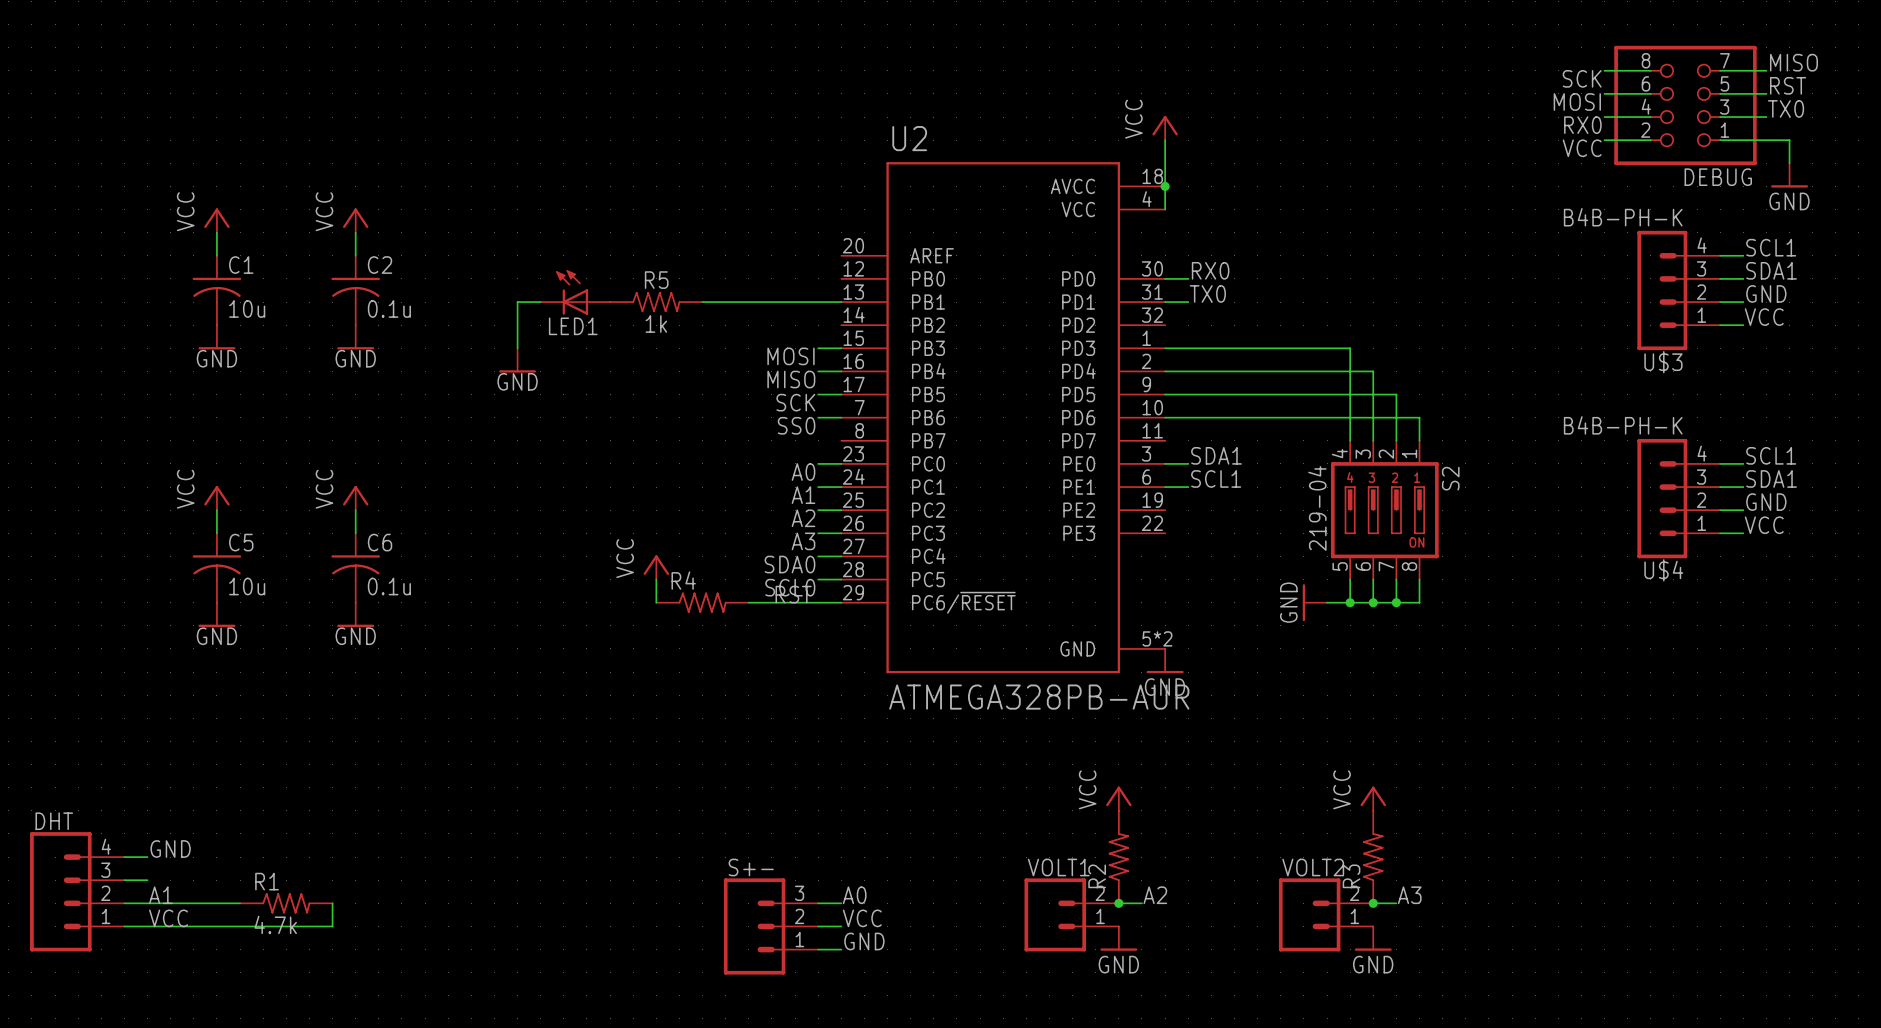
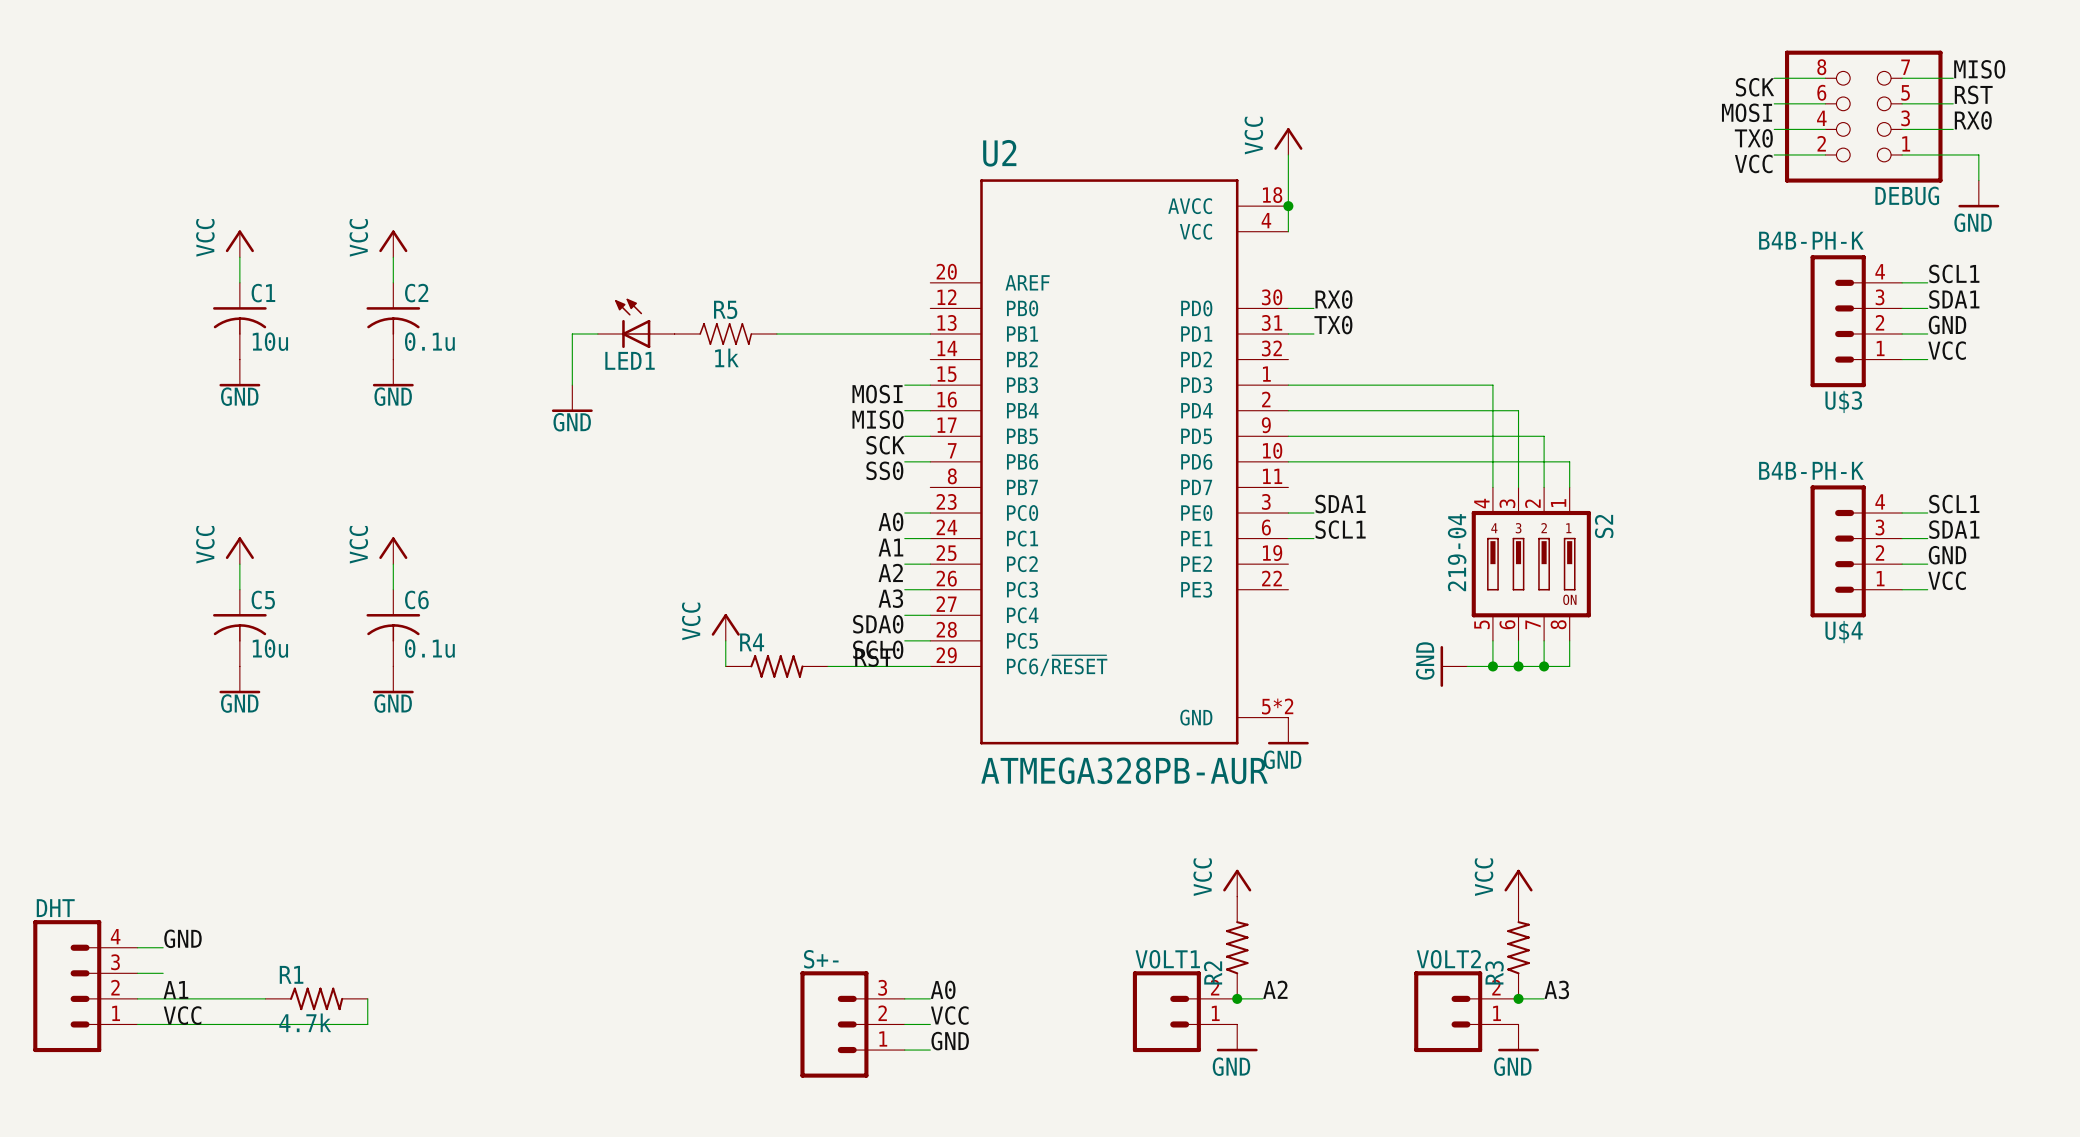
label: TX0 (1786, 108) -> RX0 (1973, 120)
label: RX0 (1582, 125) -> TX0 (1753, 138)

